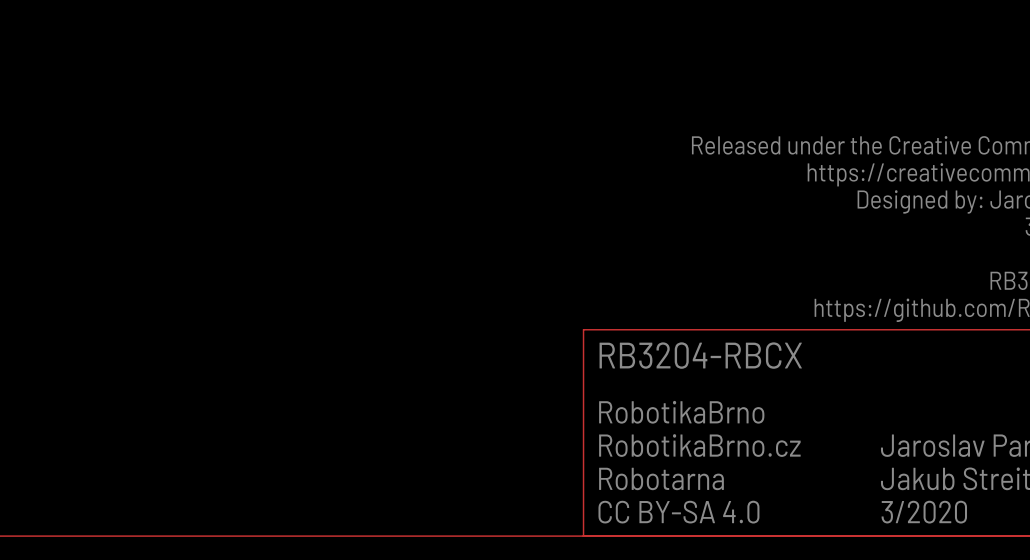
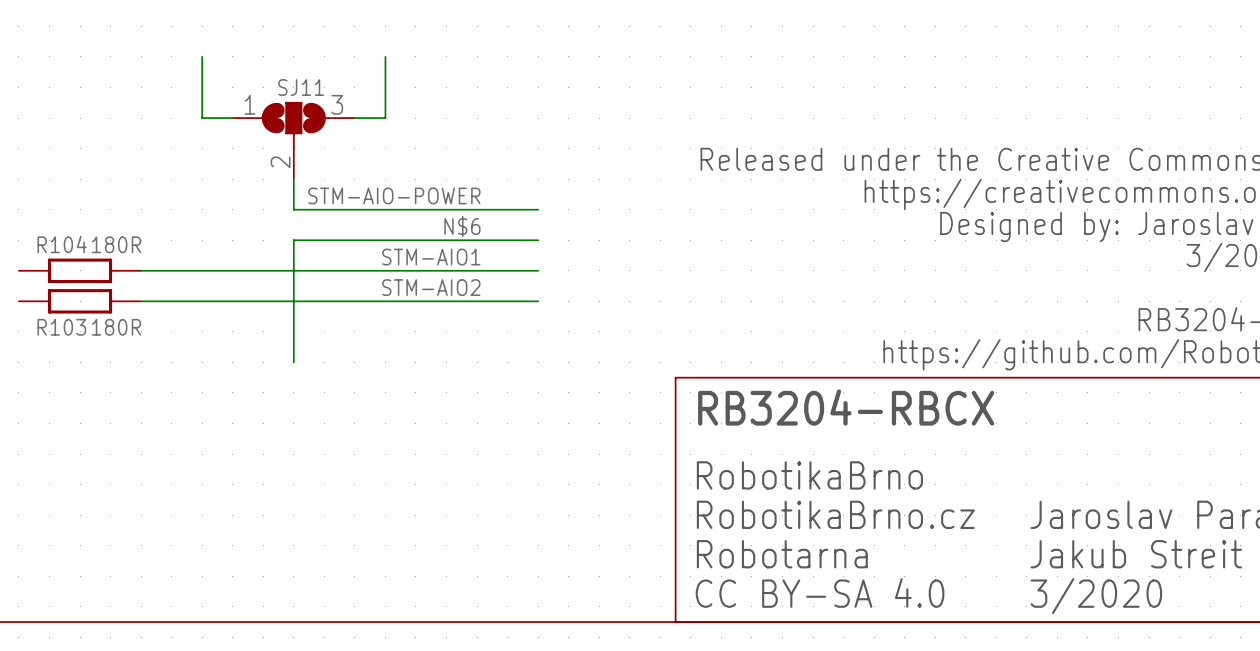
wire: none -> (202, 56) (202, 118) (232, 118)
wire: none -> (385, 56) (385, 118) (354, 118)
SJ11: none -> (293, 140)
wire: none -> (293, 179) (293, 209) (538, 209)
label: none -> STM-AIO-POWER (394, 195)
label: none -> N$6 (462, 226)
wire: none -> (538, 240) (293, 240) (293, 362)
label: none -> STM-AIO1 (431, 257)
R104: none -> 180R (80, 270)
wire: none -> (141, 270) (538, 270)
label: none -> STM-AIO2 (431, 287)
R103: none -> 180R (80, 301)
wire: none -> (141, 301) (538, 301)

